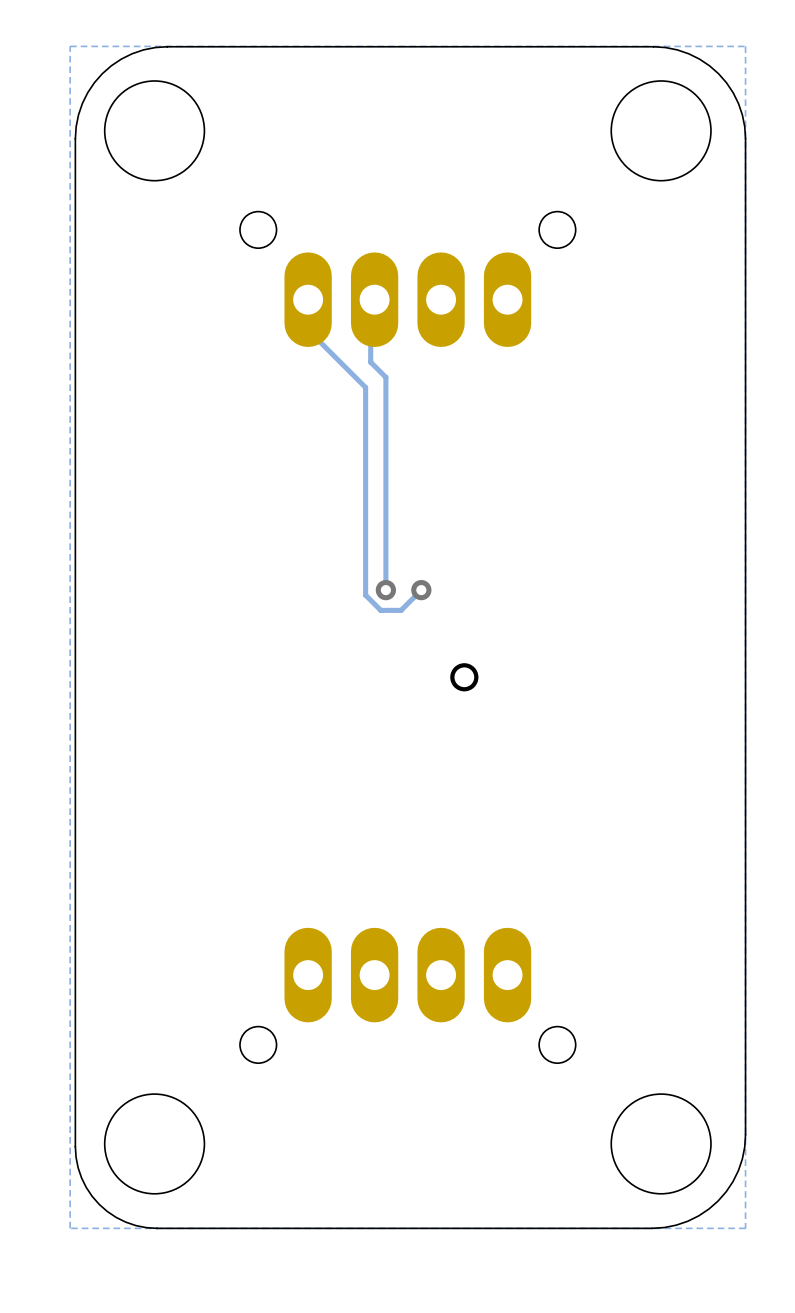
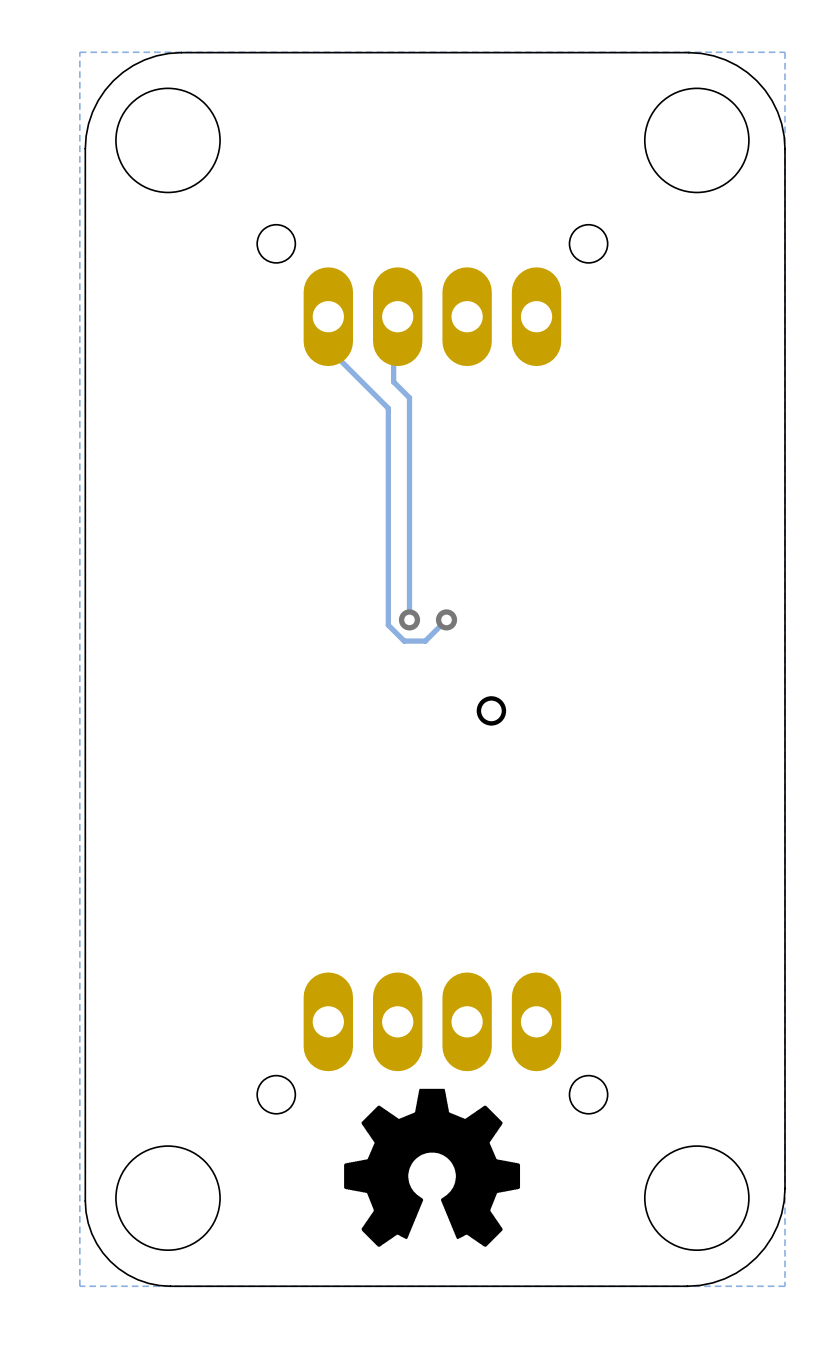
drawing: none -> [344, 1088, 521, 1247]

